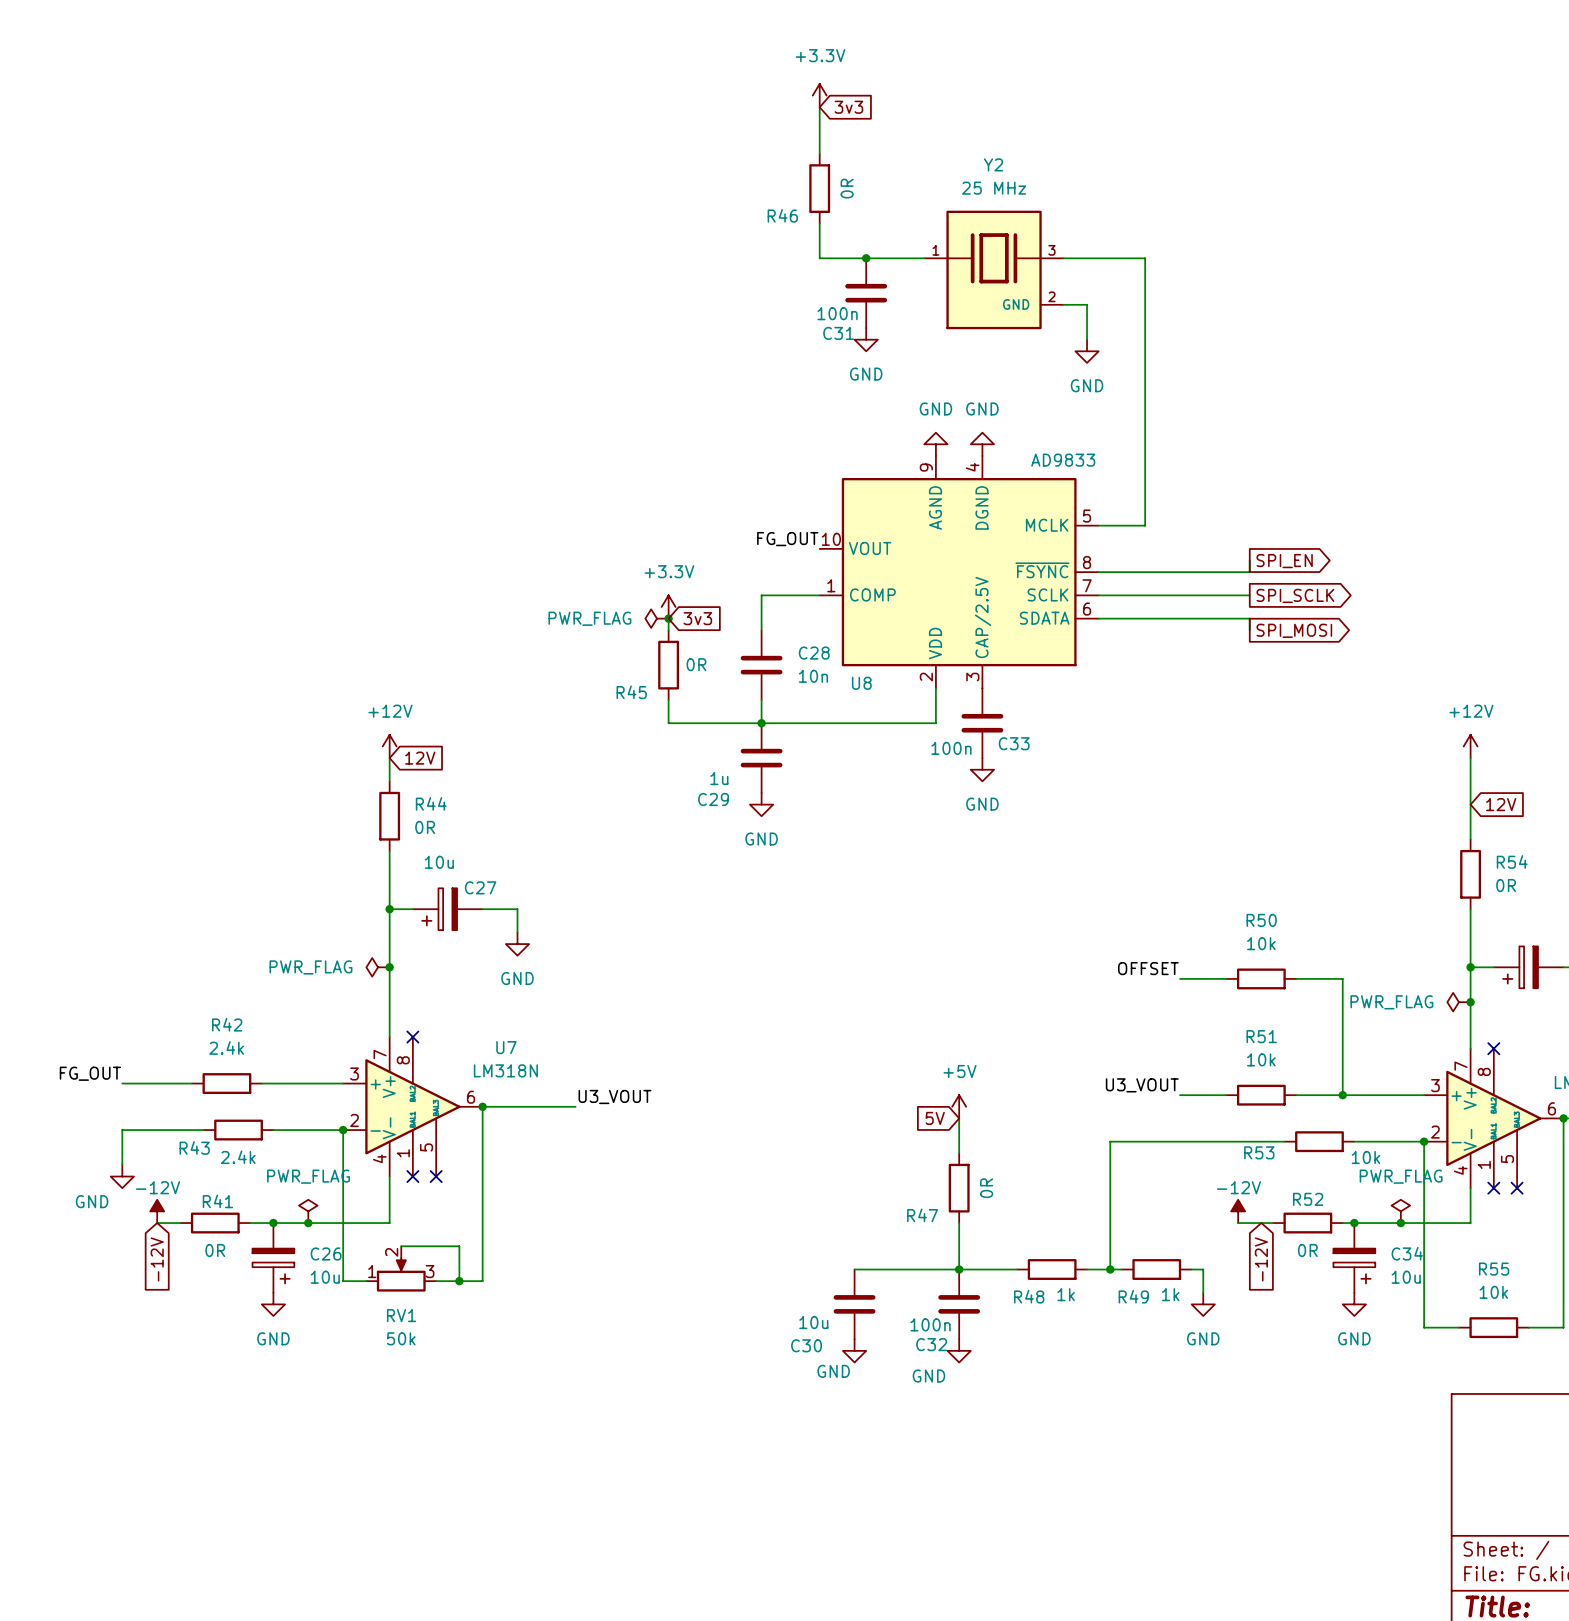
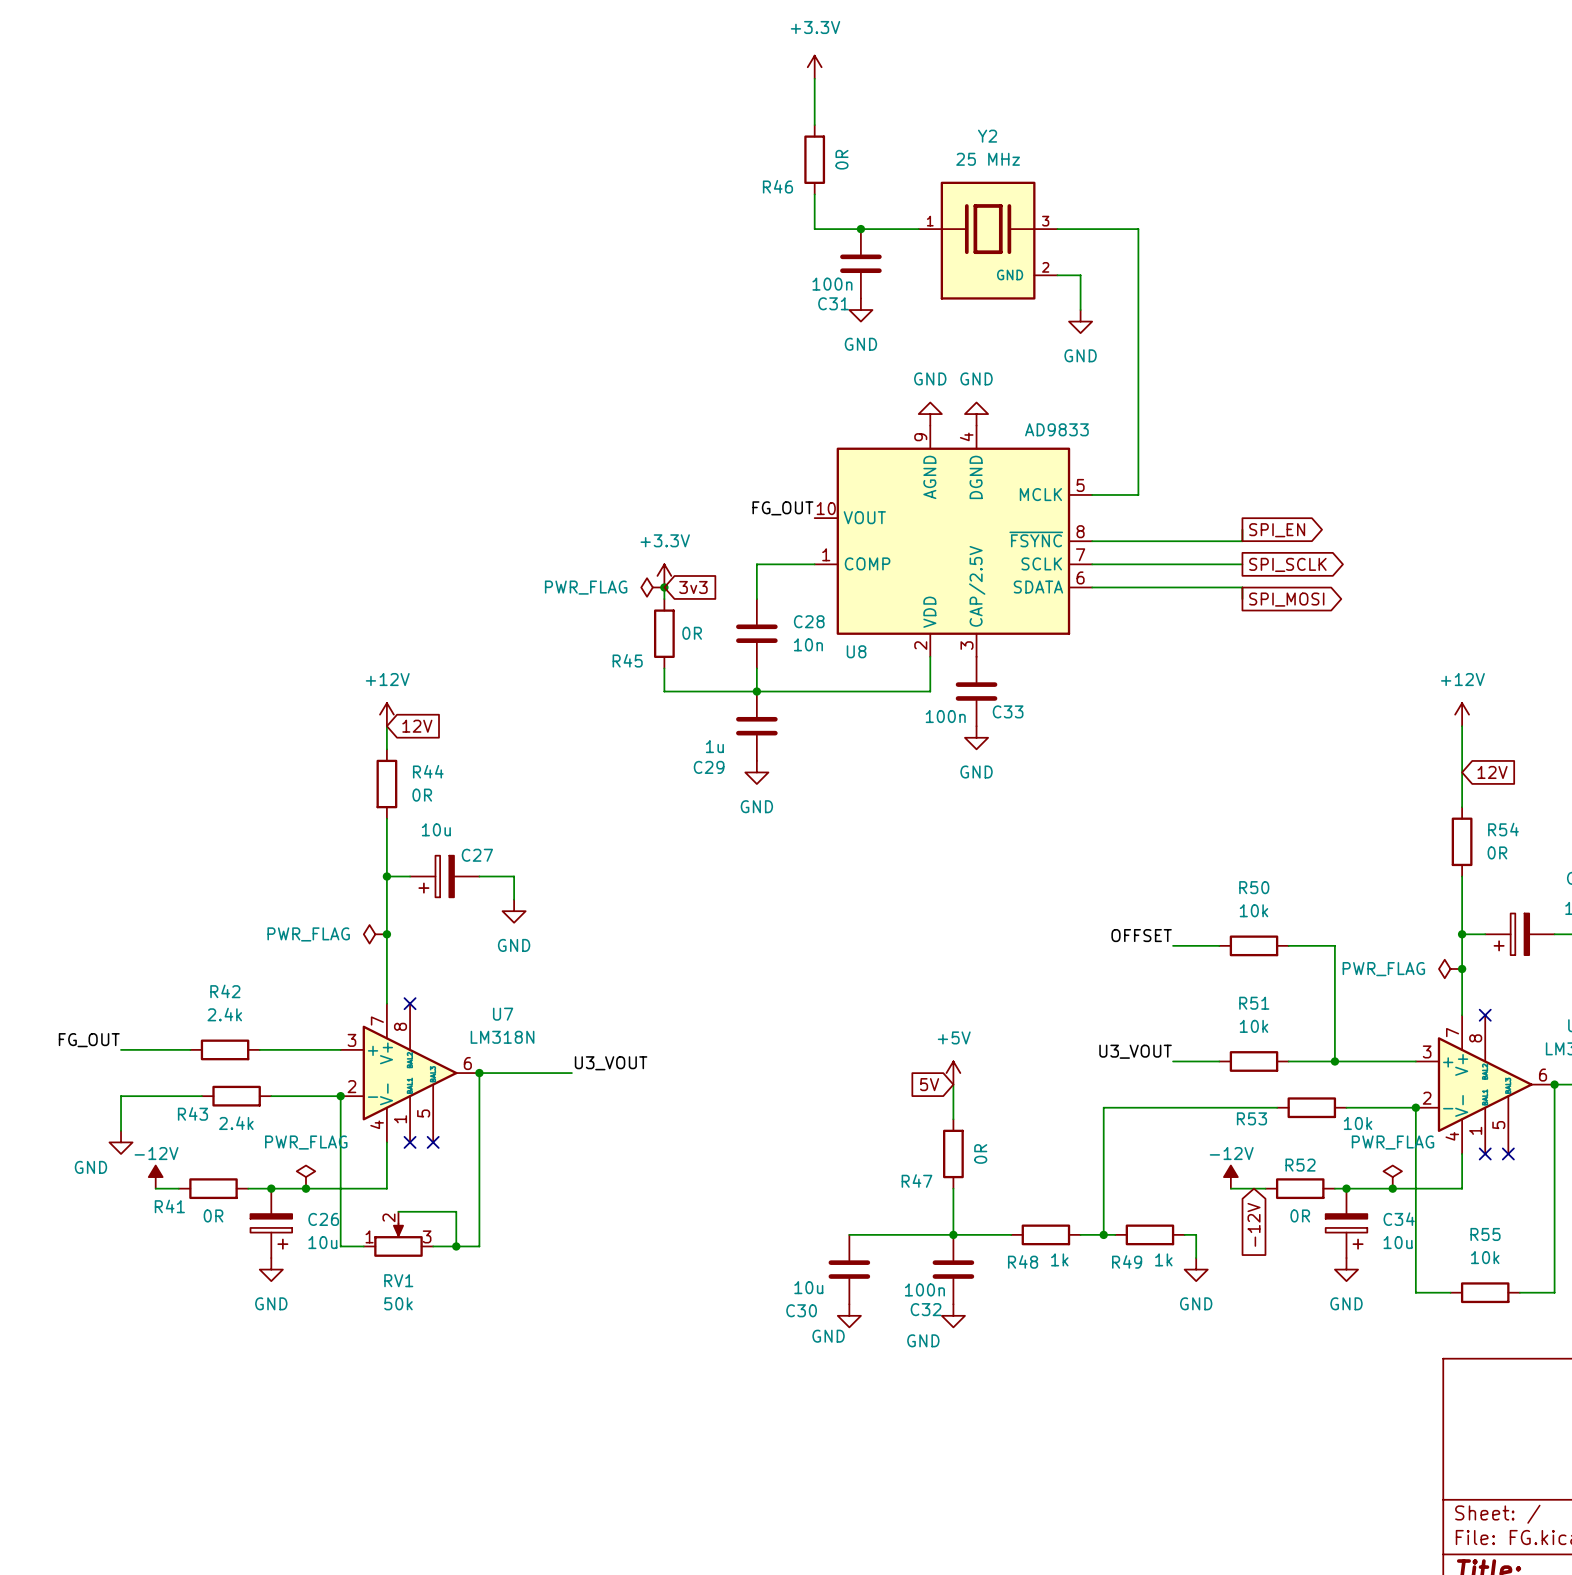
global label: 3v3 (848, 107) -> none
R41 name position: R41 (217, 1201) -> R41 (169, 1206)
global label: -12V (157, 1259) -> none

